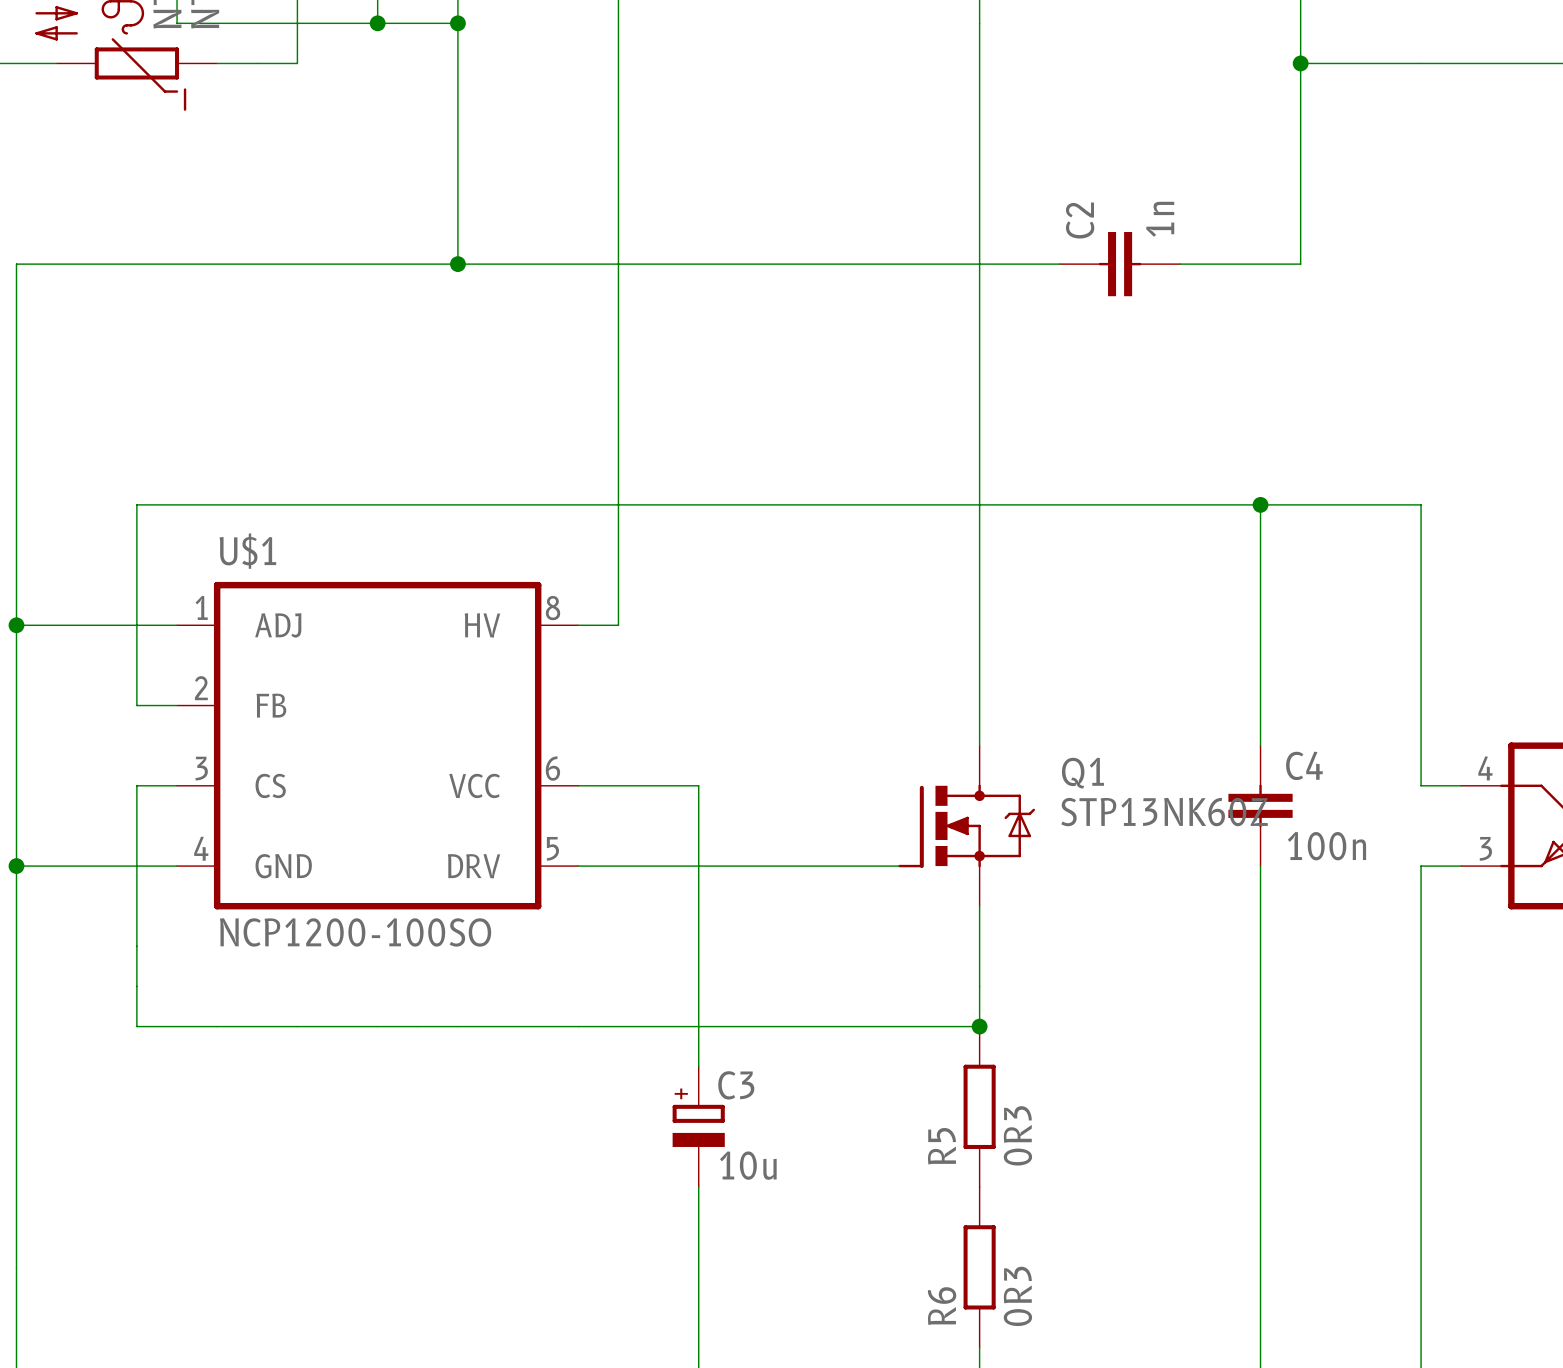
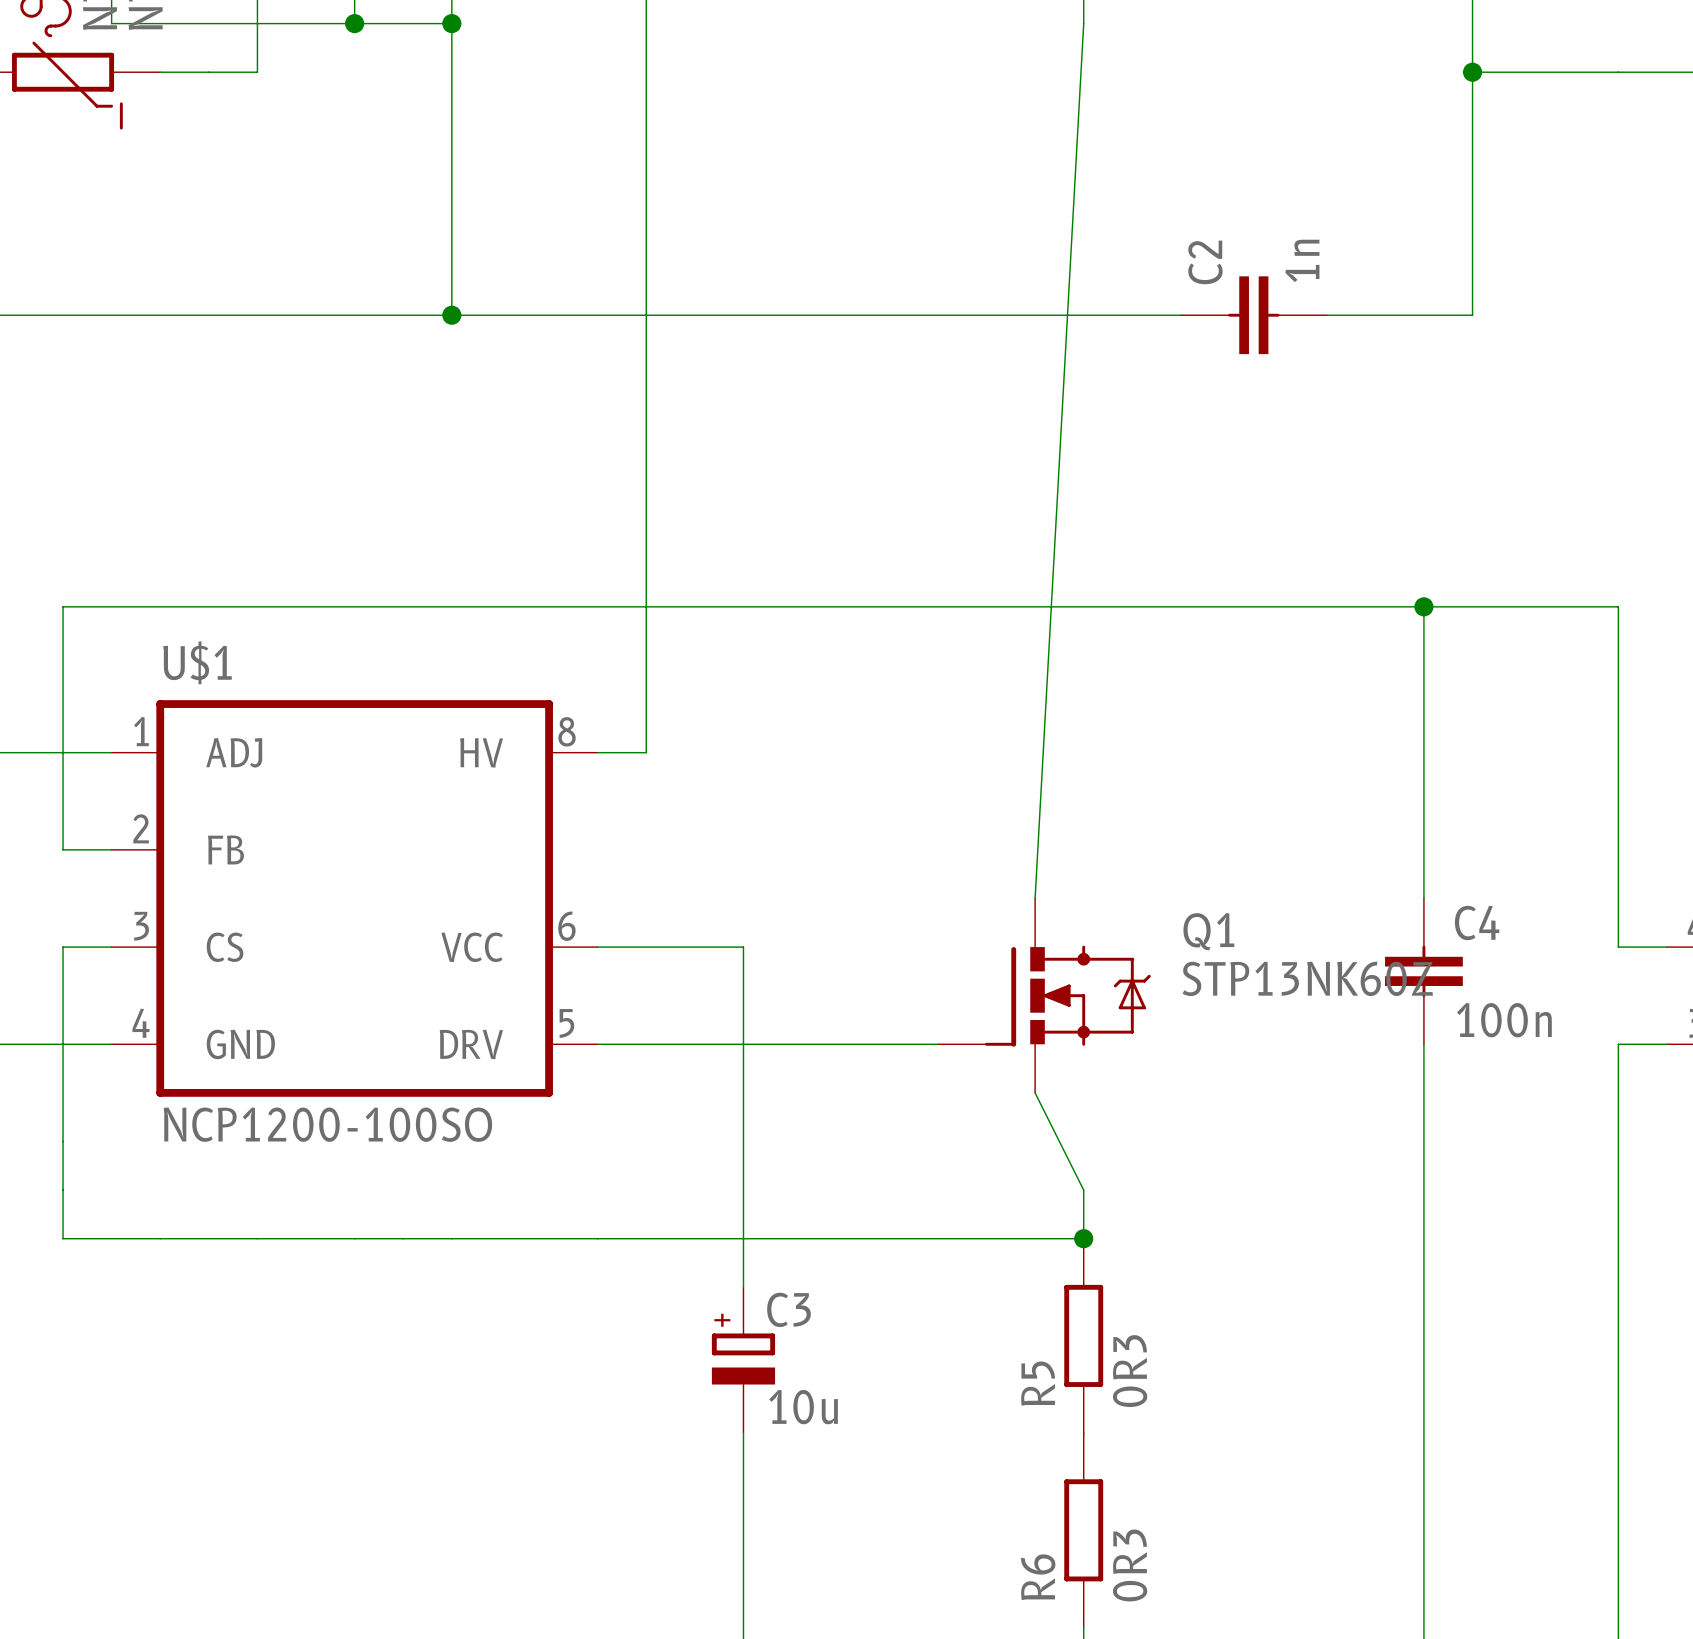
wire: (979, 23) (979, 745) -> (1083, 23) (1035, 898)
Q1 symbol: [898, 745, 1036, 907] -> [937, 898, 1151, 1093]
wire: (979, 906) (979, 986) -> (1035, 1092) (1083, 1190)

